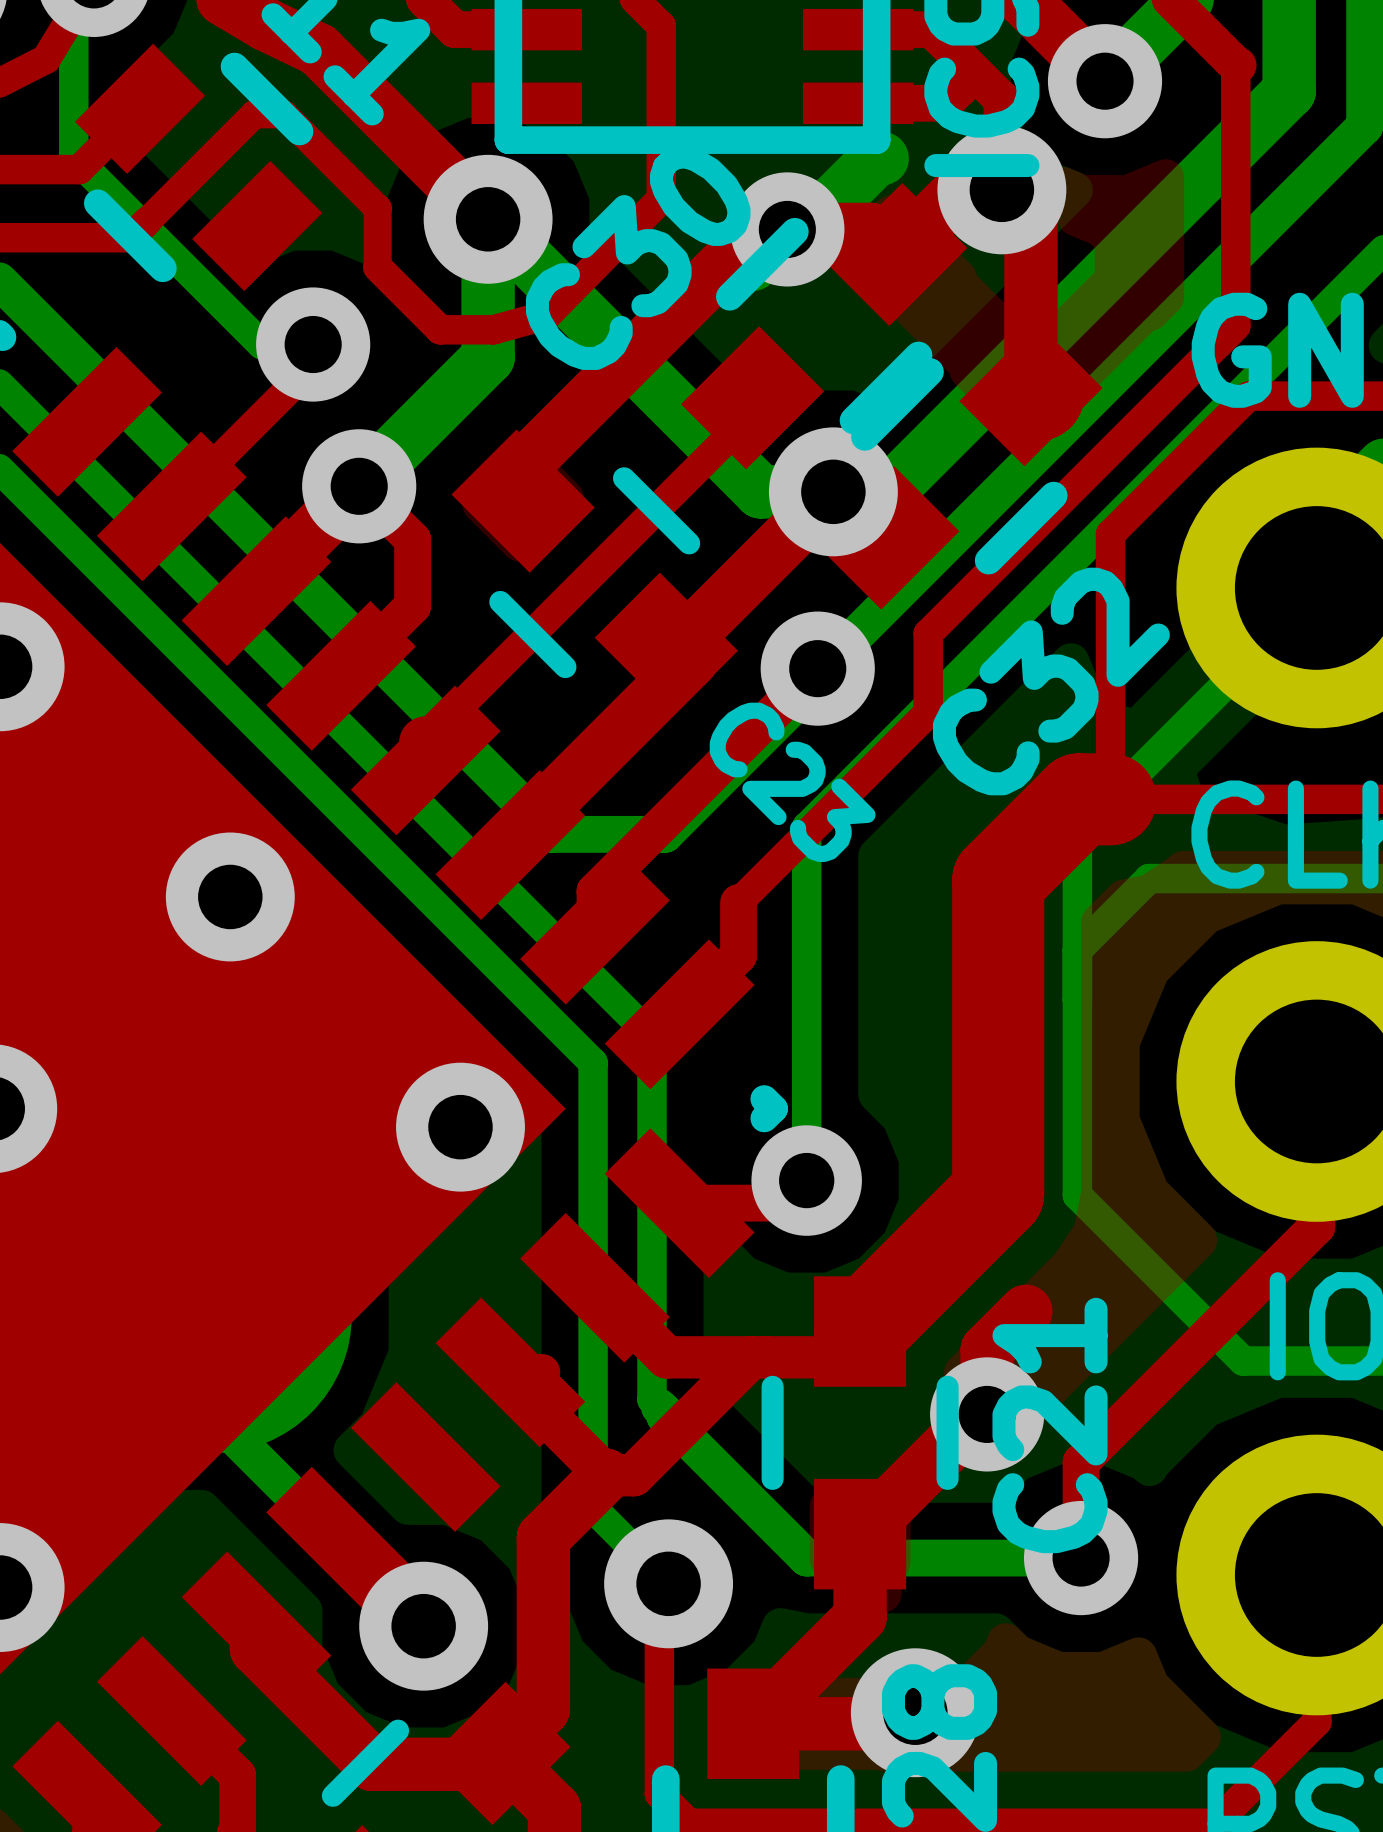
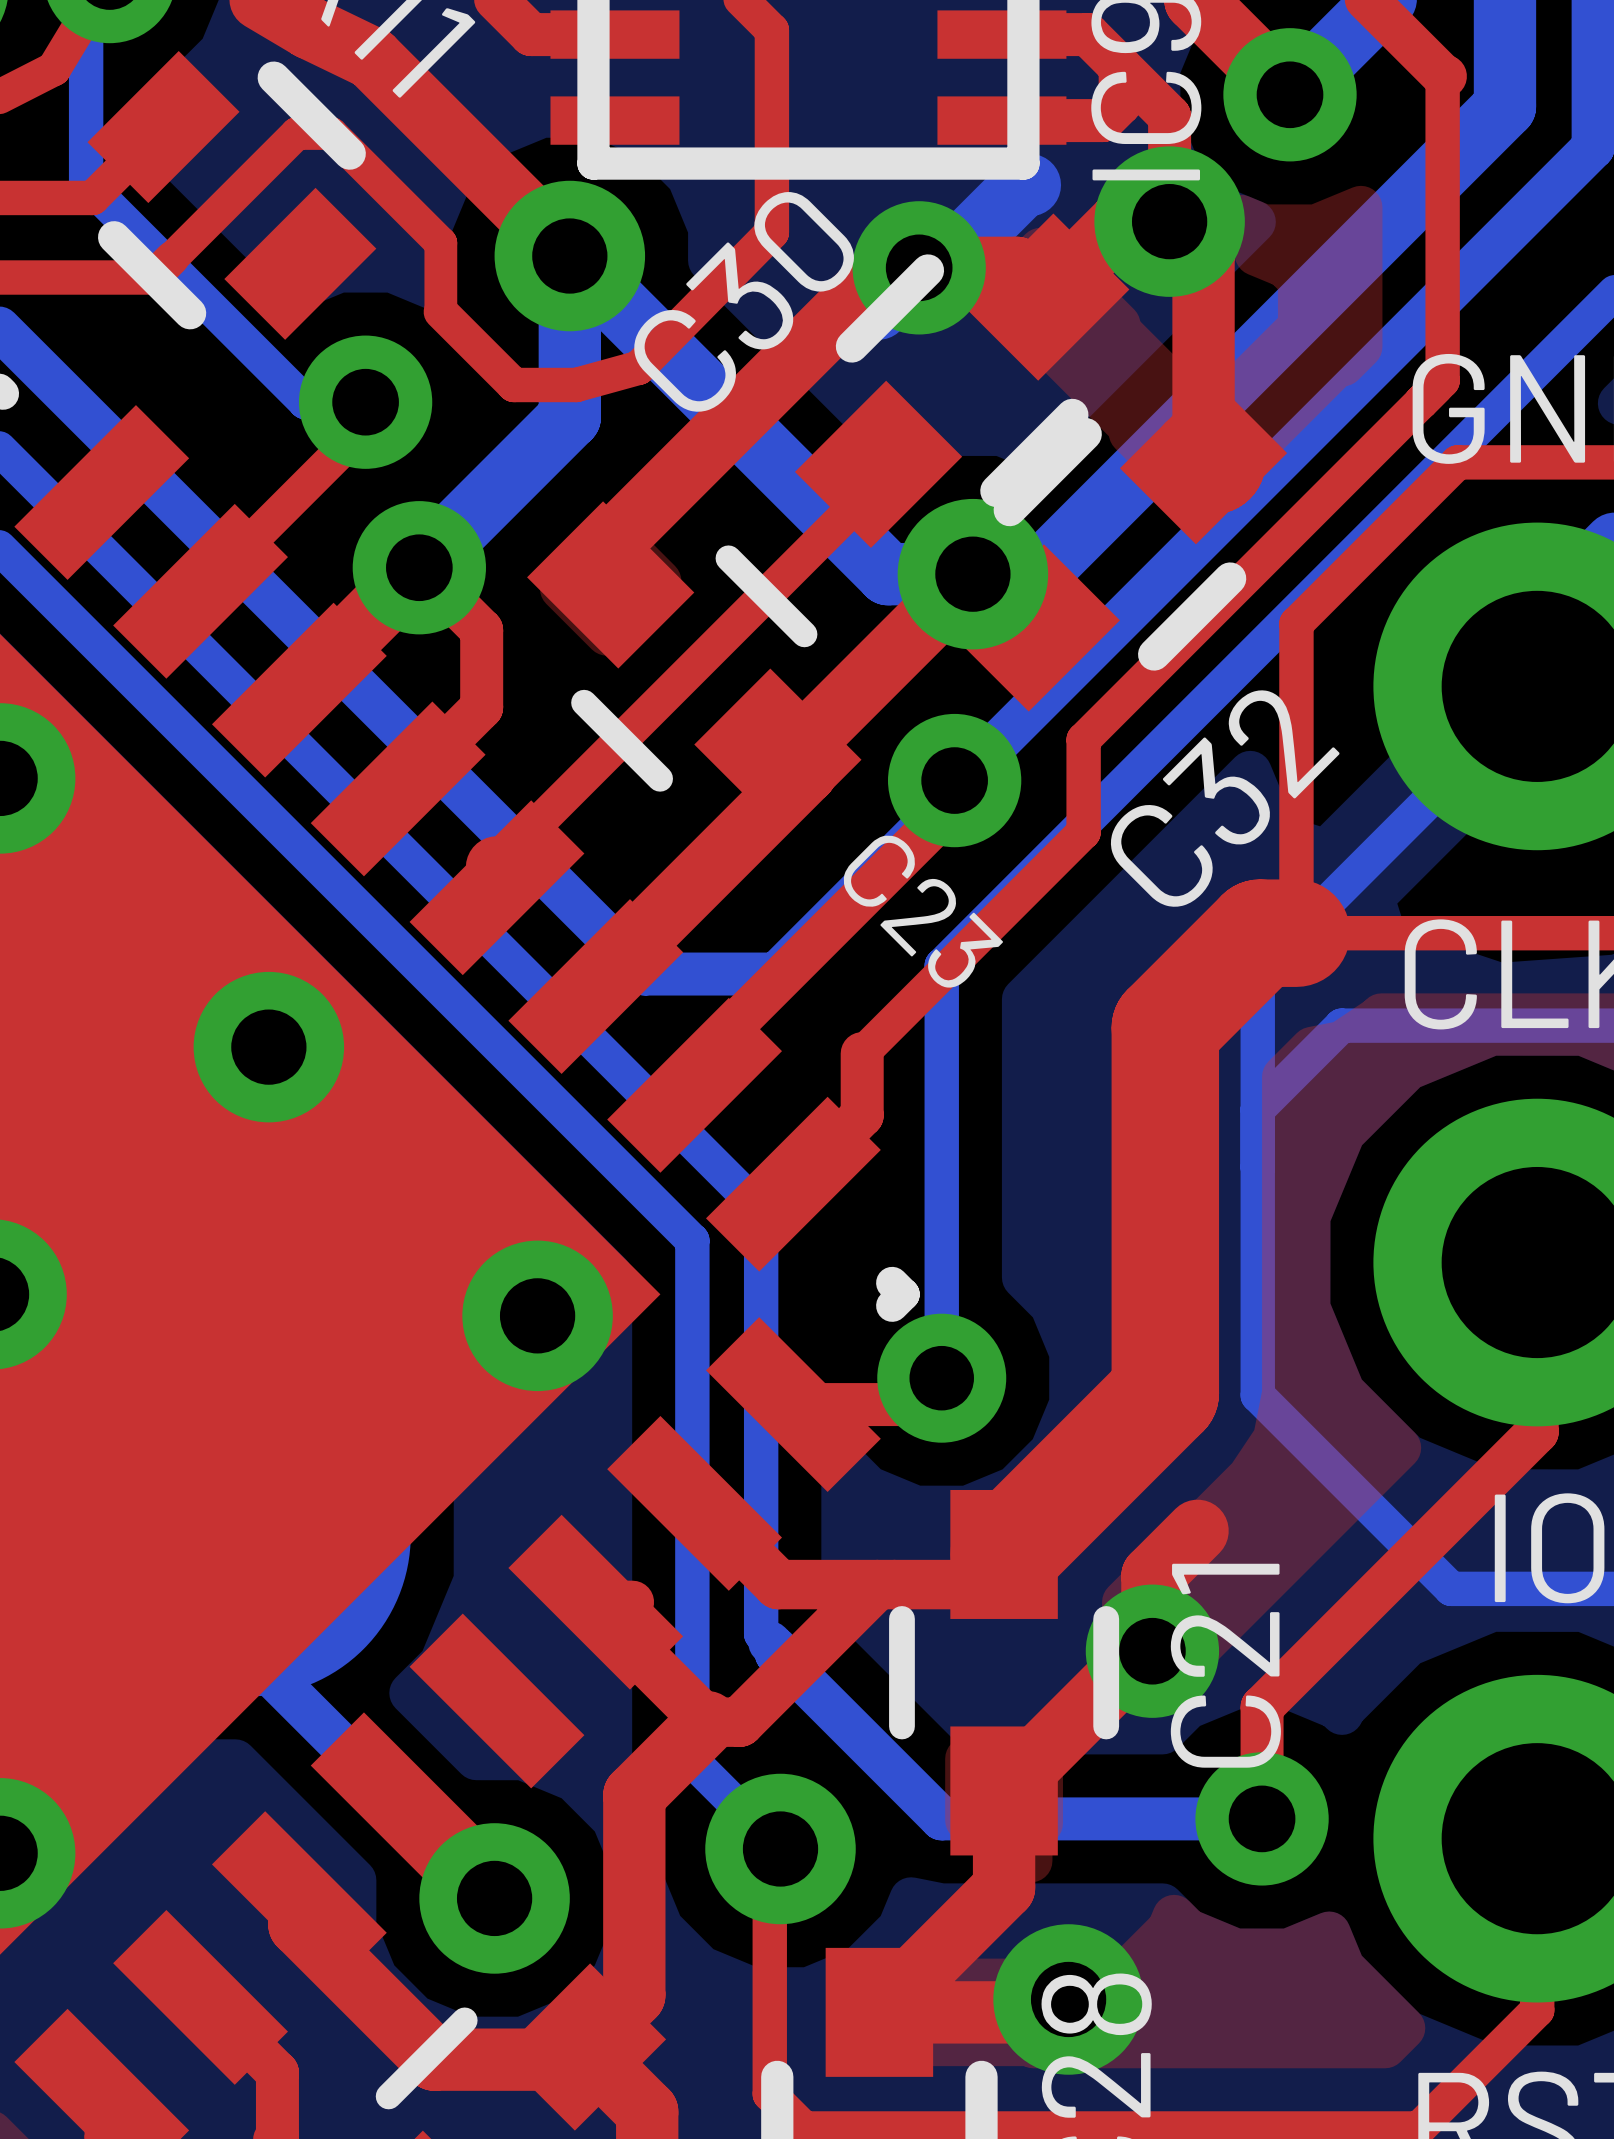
top track: (817, 668) (594, 891) (594, 911) -> (954, 780) (954, 804) (694, 1064)

